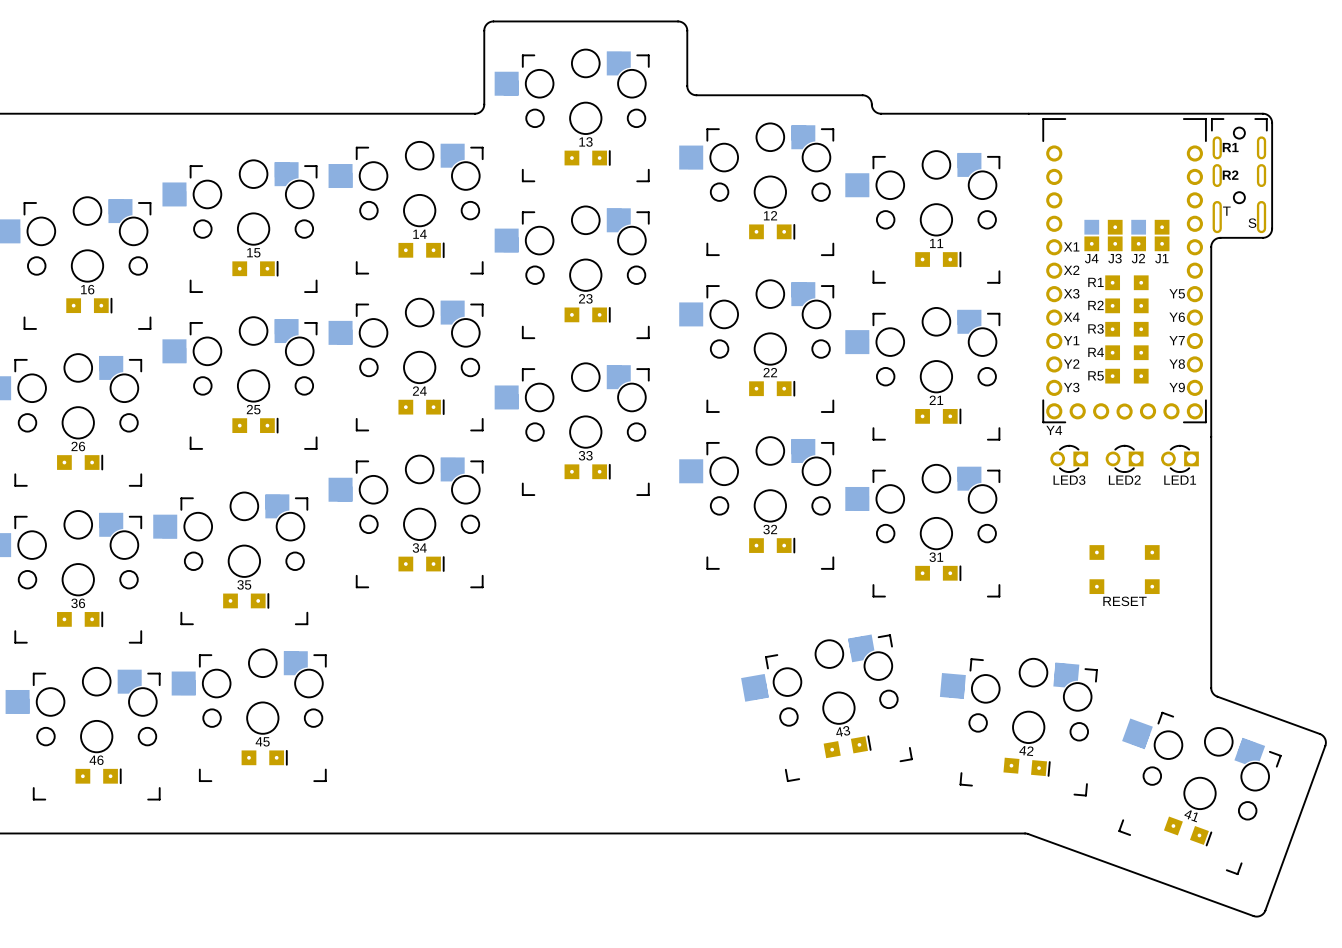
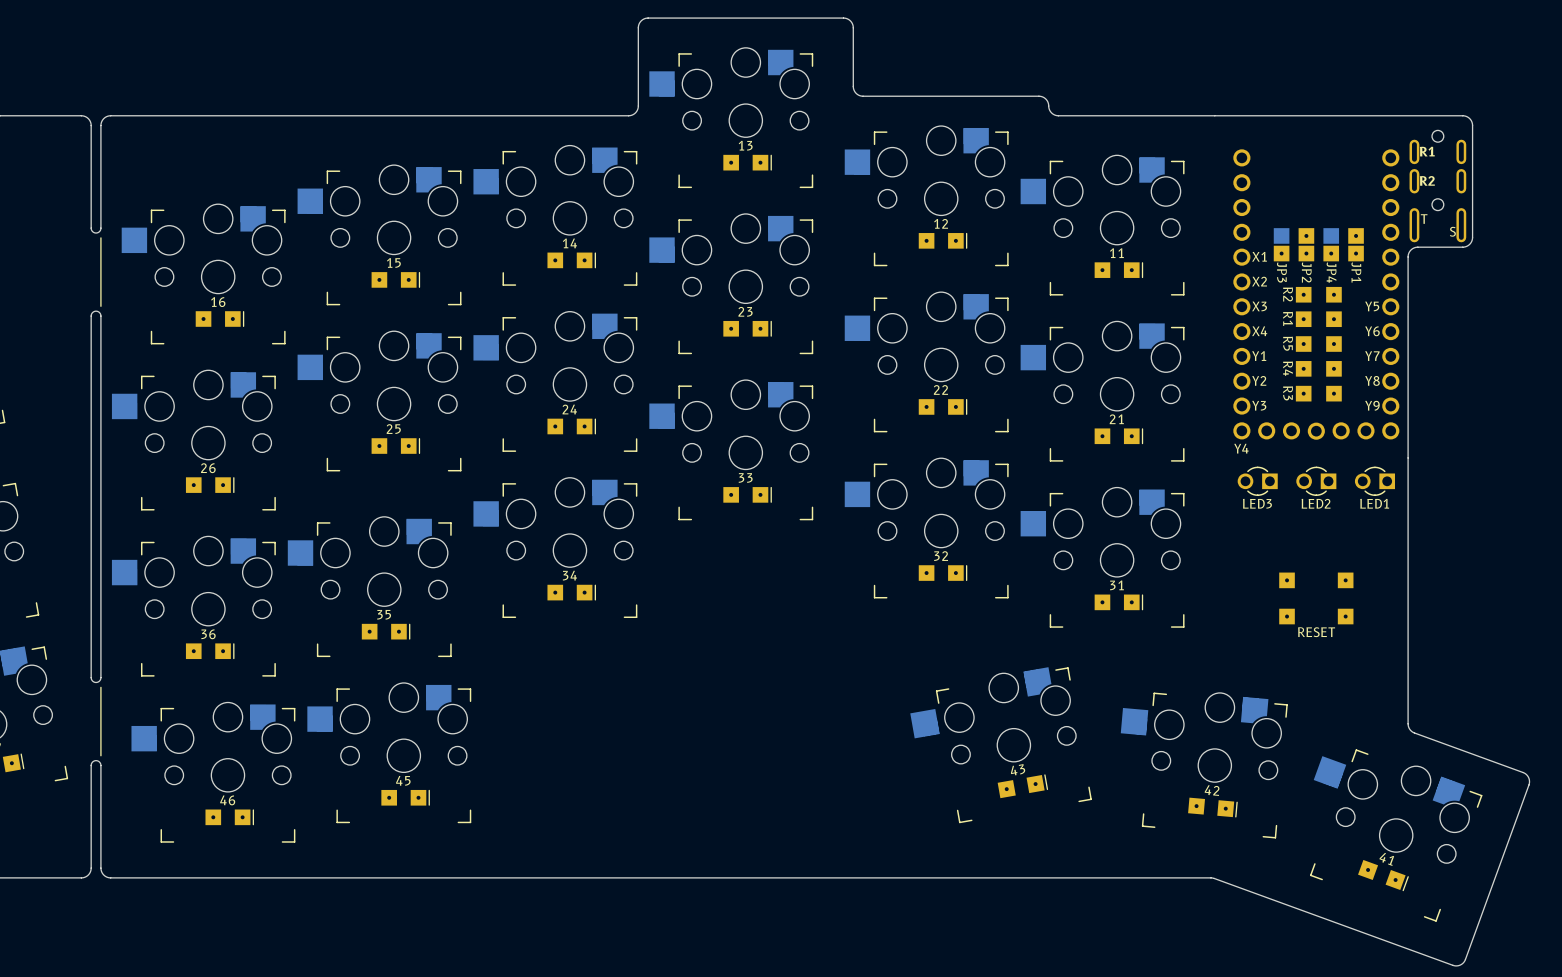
part footprint: [1211, 118, 1268, 234] -> [1409, 130, 1467, 243]
JP3 value: J4 (1091, 258) -> none
JP2 value: J3 (1115, 258) -> none
JP4 value: J2 (1138, 258) -> none
JP1 value: J1 (1161, 258) -> none
JP3 name: none -> JP3 (1281, 272)
JP2 name: none -> JP2 (1306, 272)
JP4 name: none -> JP4 (1331, 272)
JP1 name: none -> JP1 (1356, 272)
part: (1124, 270) -> none
R2 value: R1 (1095, 282) -> none
R2 name: none -> R2 (1288, 294)
part: none -> (1316, 294)
R1 value: R2 (1095, 305) -> none
R1 name: none -> R1 (1288, 318)
R5 value: R3 (1096, 328) -> none
R5 name: none -> R5 (1288, 343)
R4 value: R4 (1096, 352) -> none
R4 name: none -> R4 (1288, 368)
R3 value: R5 (1096, 375) -> none
R3 name: none -> R3 (1288, 393)

